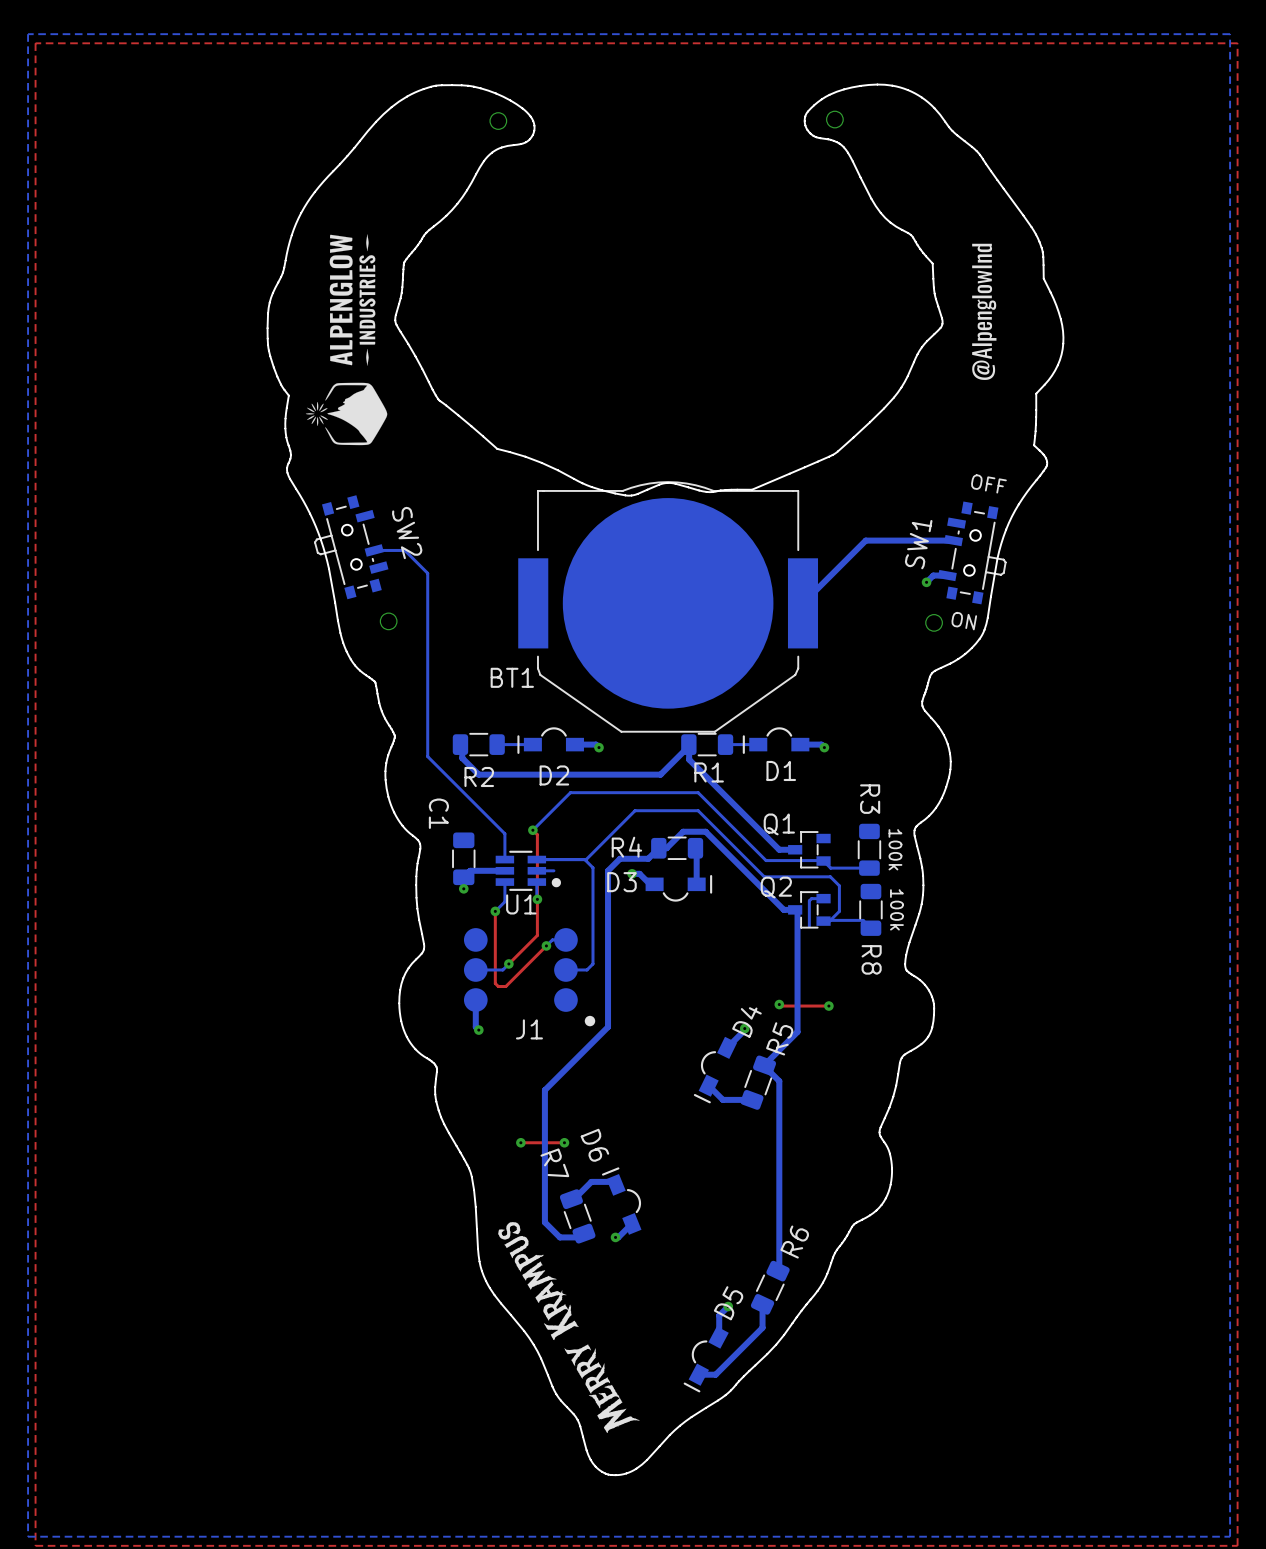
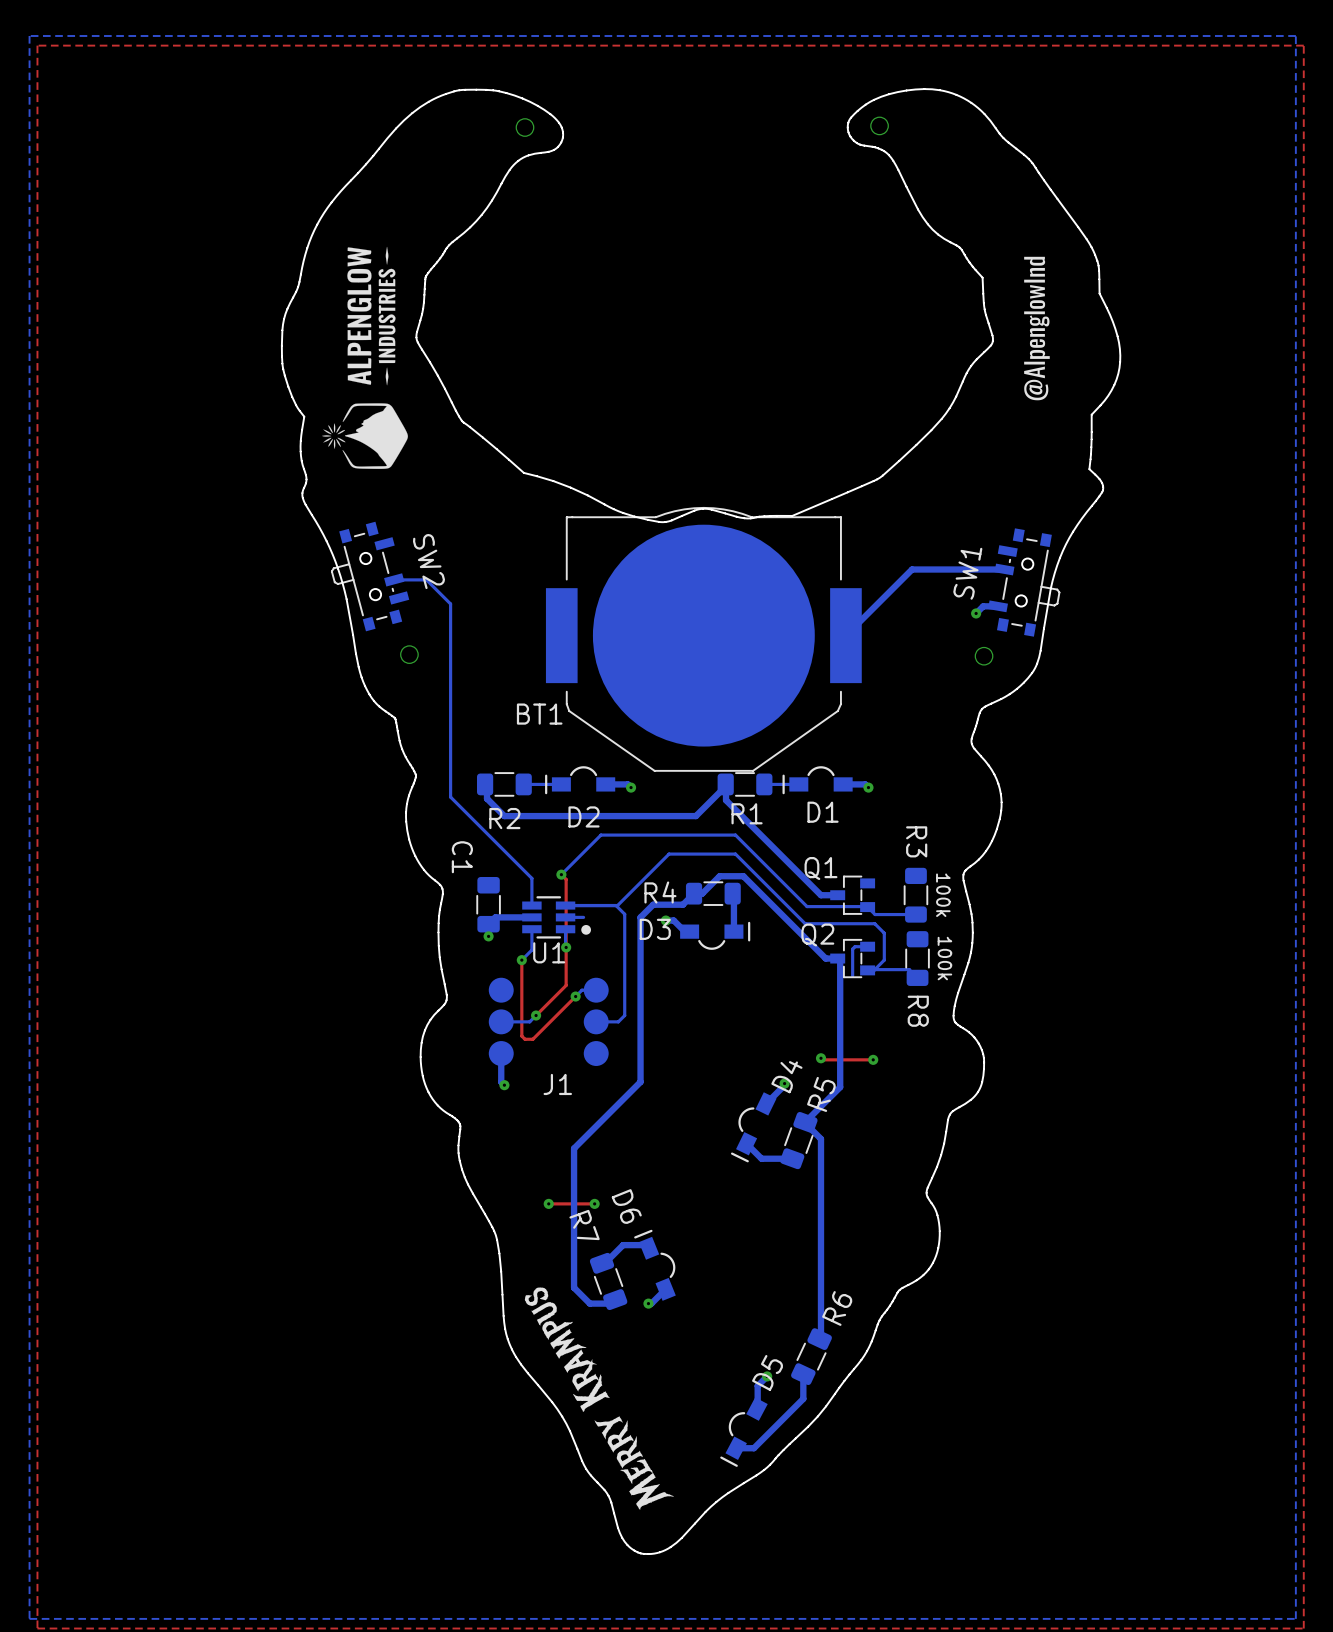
text: OFF (988, 483) -> none
text: ON (964, 621) -> none
drawing: [584, 1015, 596, 1027] -> none

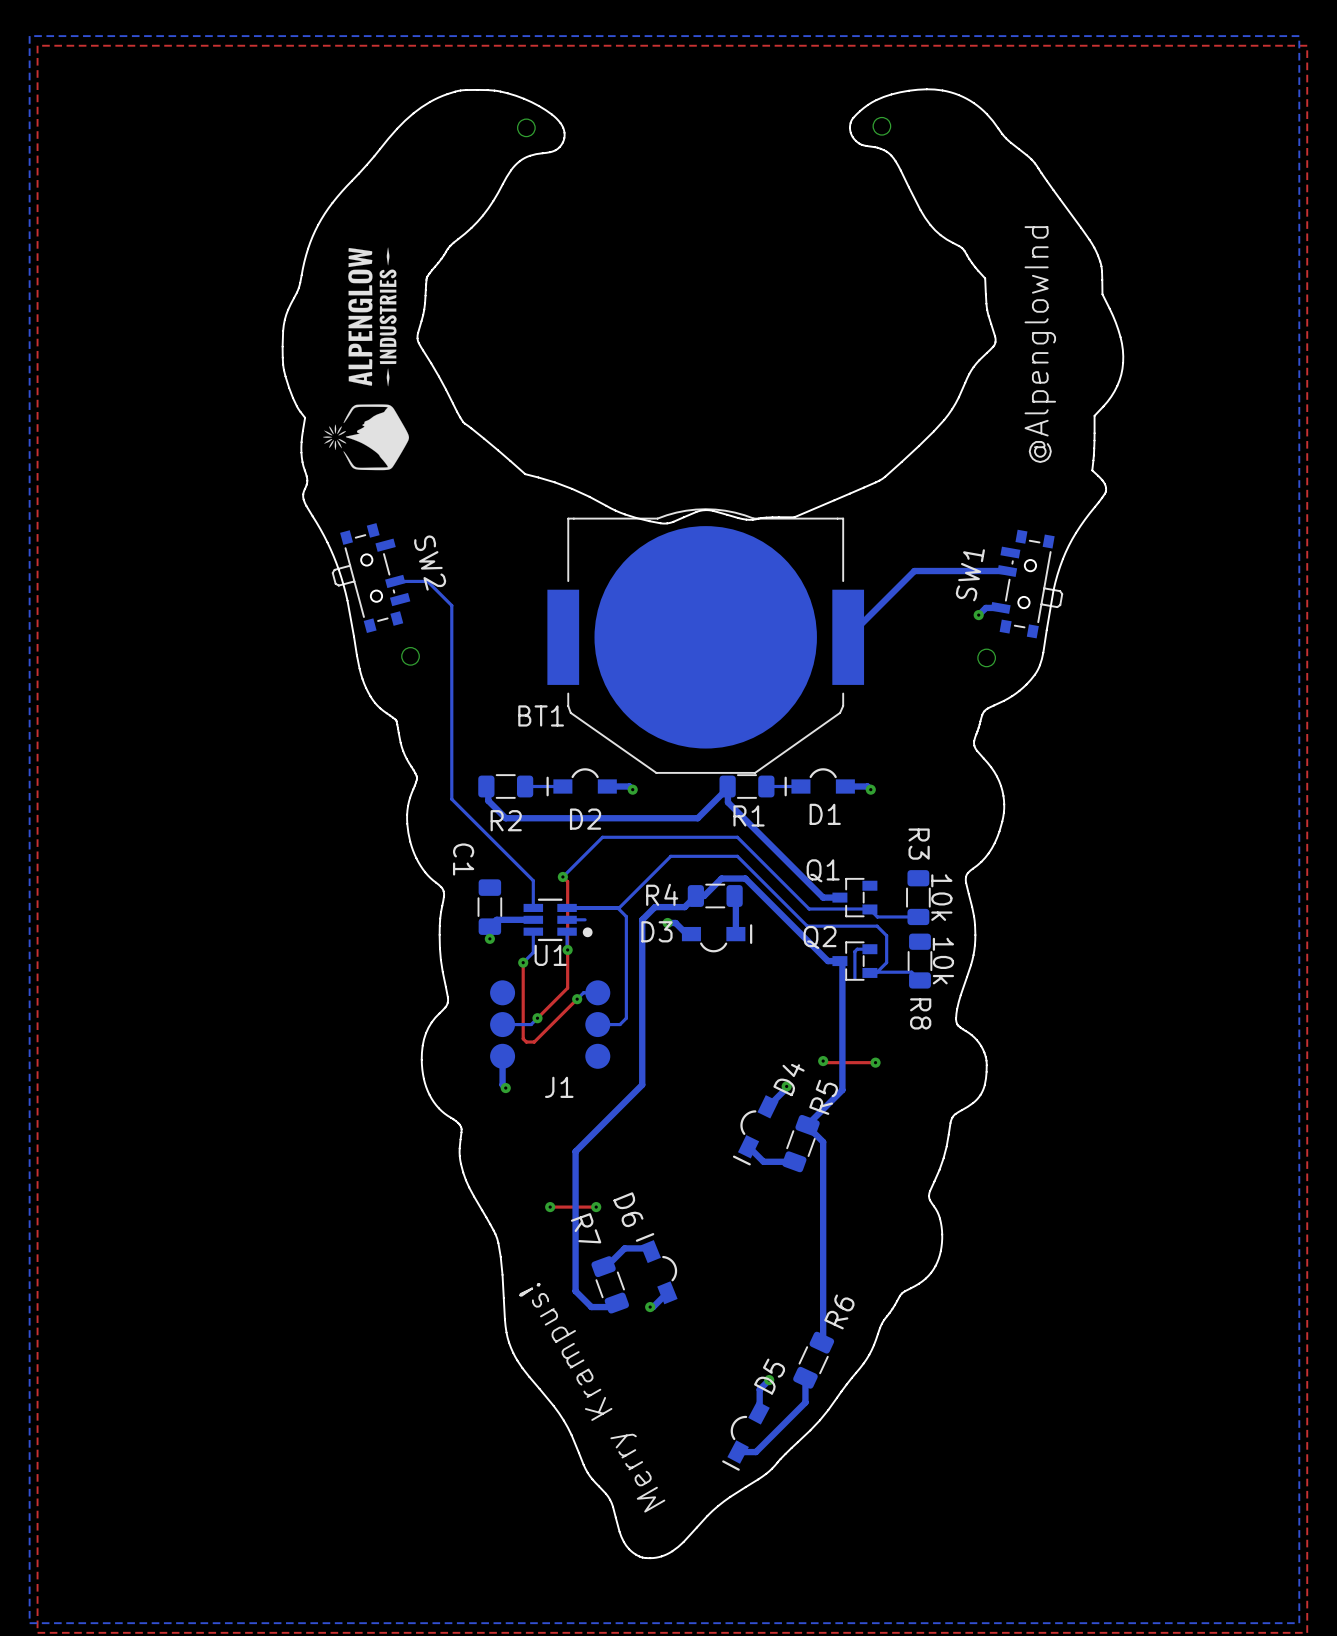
drawing: [1024, 256, 1050, 401] -> none
text: none -> @AlpenglowInd (1040, 344)
R3 value: 100k (943, 895) -> 10k (941, 897)
R8 value: 100k (944, 958) -> 10k (943, 961)
drawing: [524, 1287, 674, 1510] -> none
text: none -> Merry Krampus! (592, 1397)

